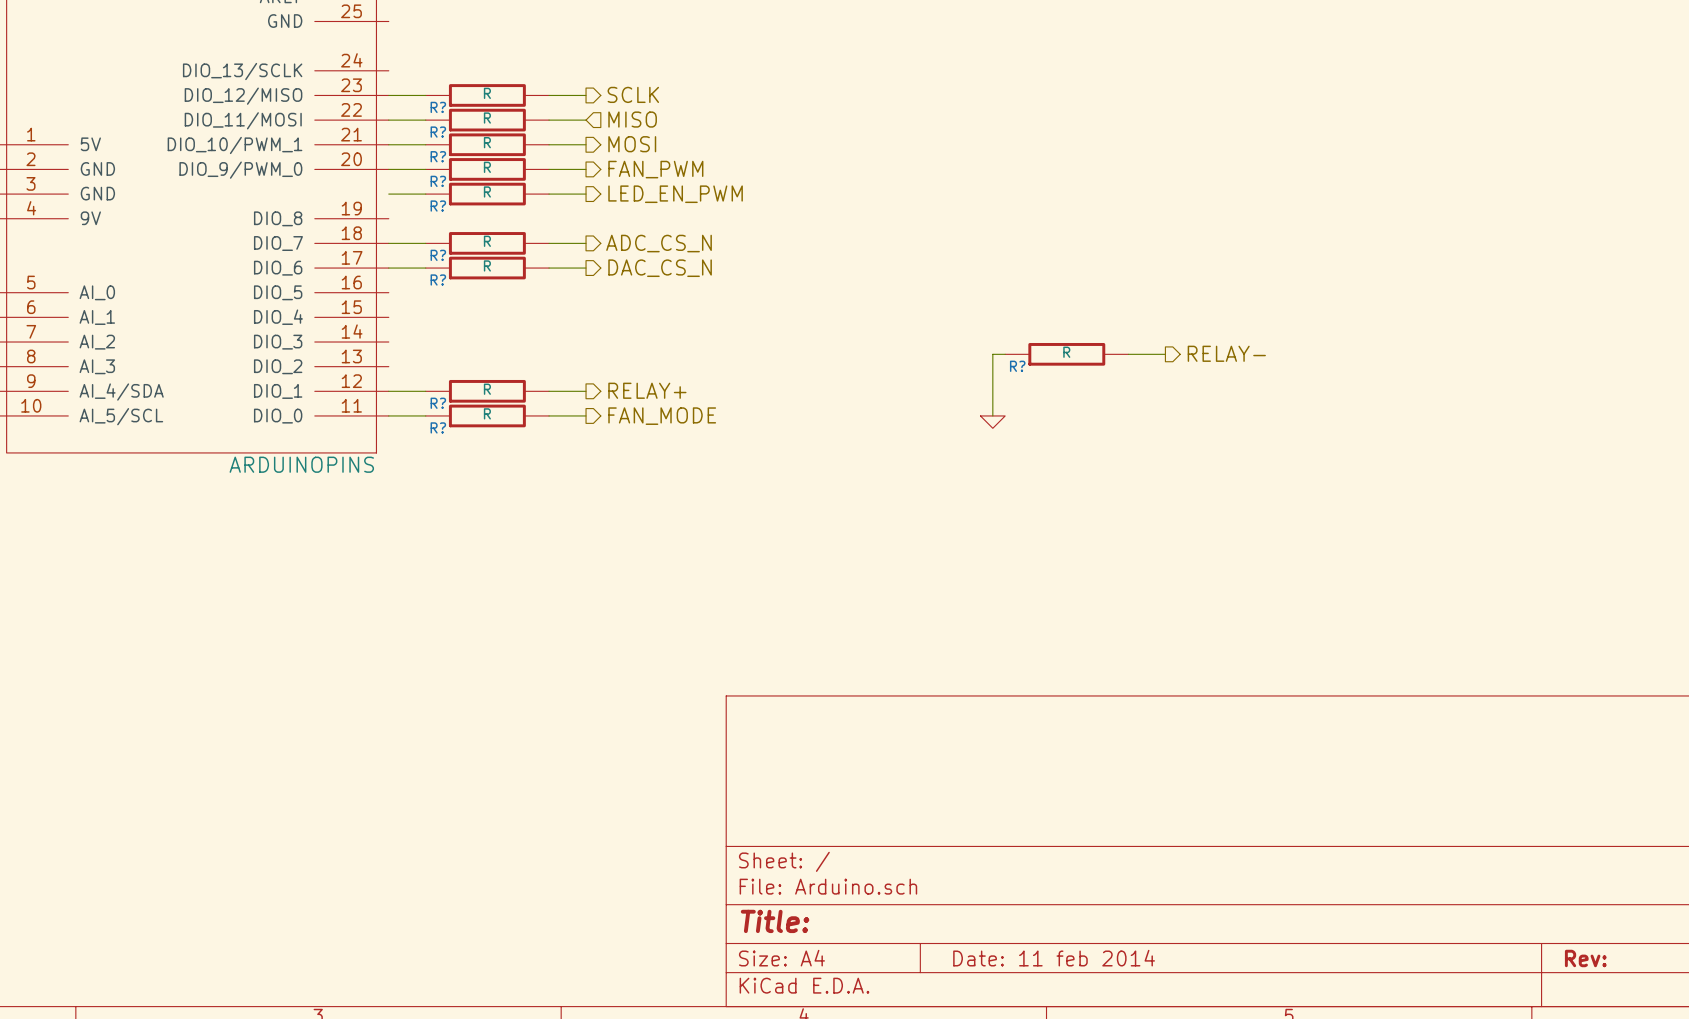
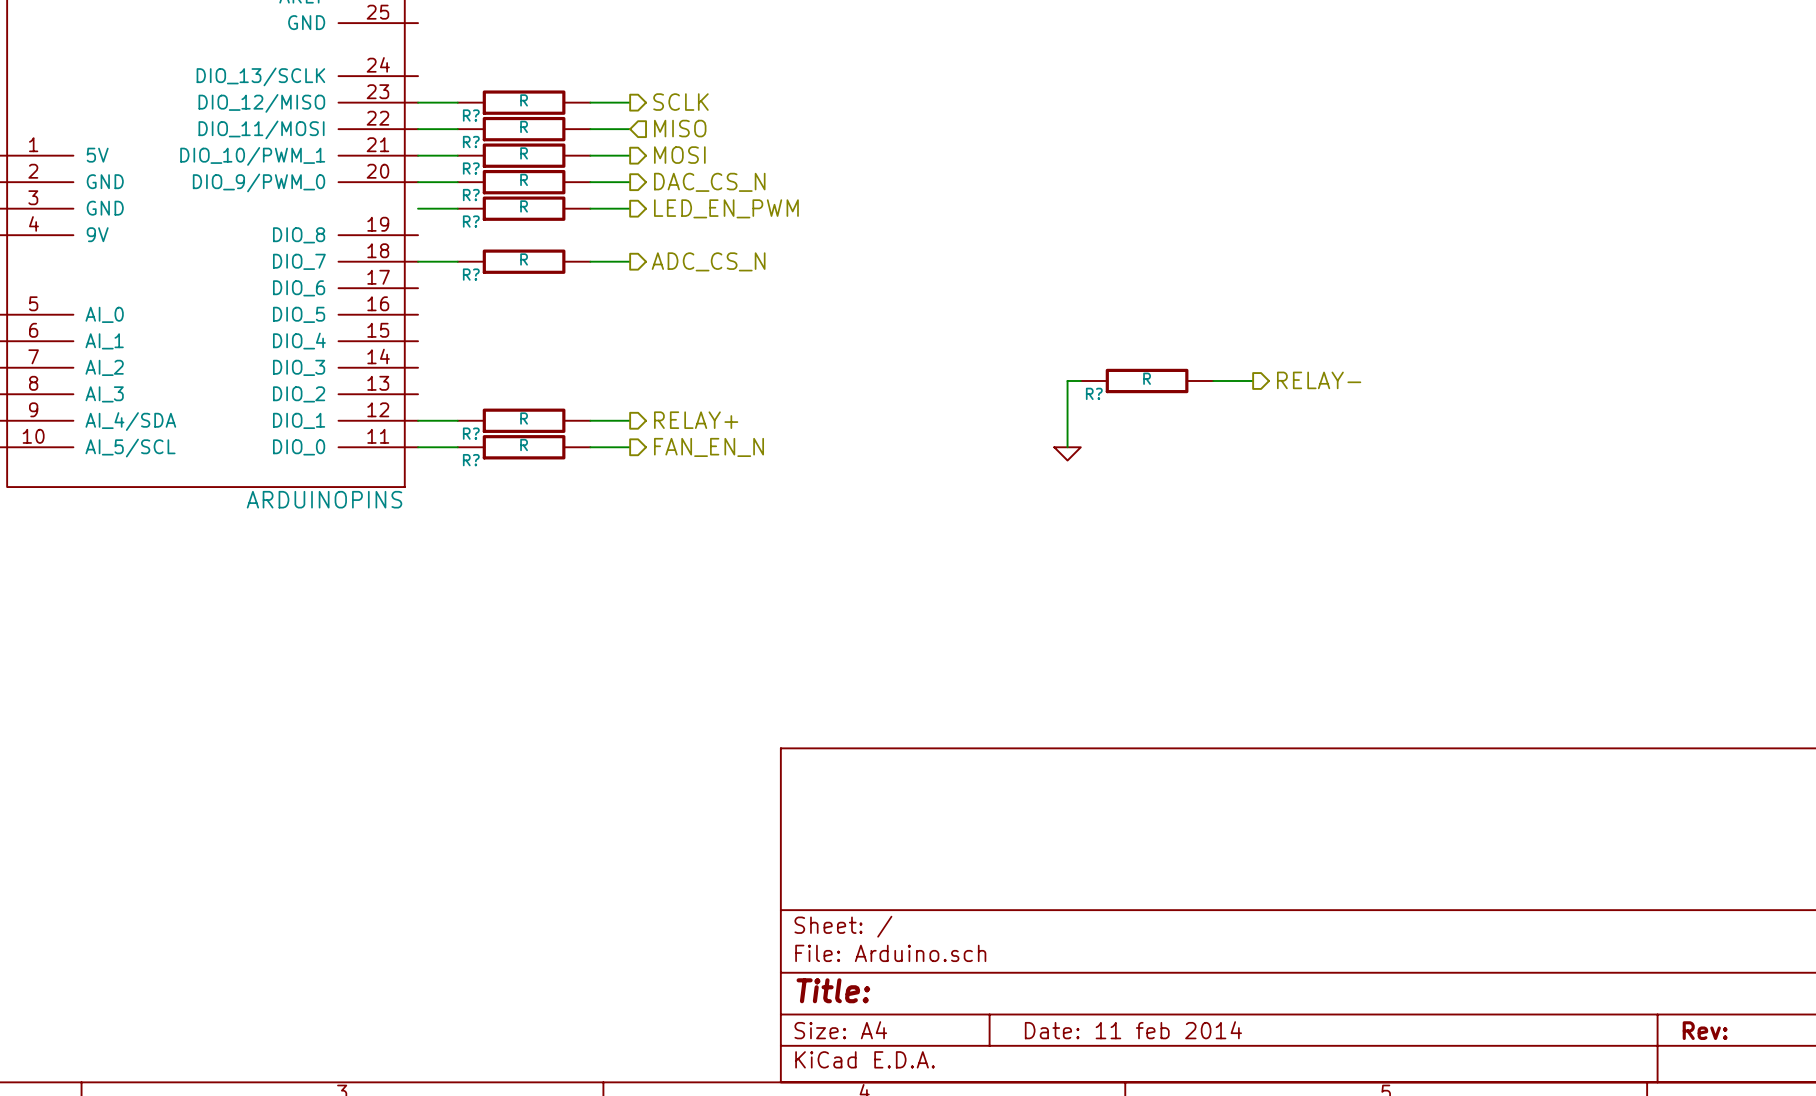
hierarchical label: FAN_PWM (655, 169) -> DAC_CS_N (709, 182)
wire: (388, 268) (425, 268) -> none
R?: R (487, 268) -> none
wire: (549, 268) (586, 268) -> none
hierarchical label: DAC_CS_N (660, 268) -> none
hierarchical label: FAN_MODE (662, 416) -> FAN_EN_N (709, 447)

